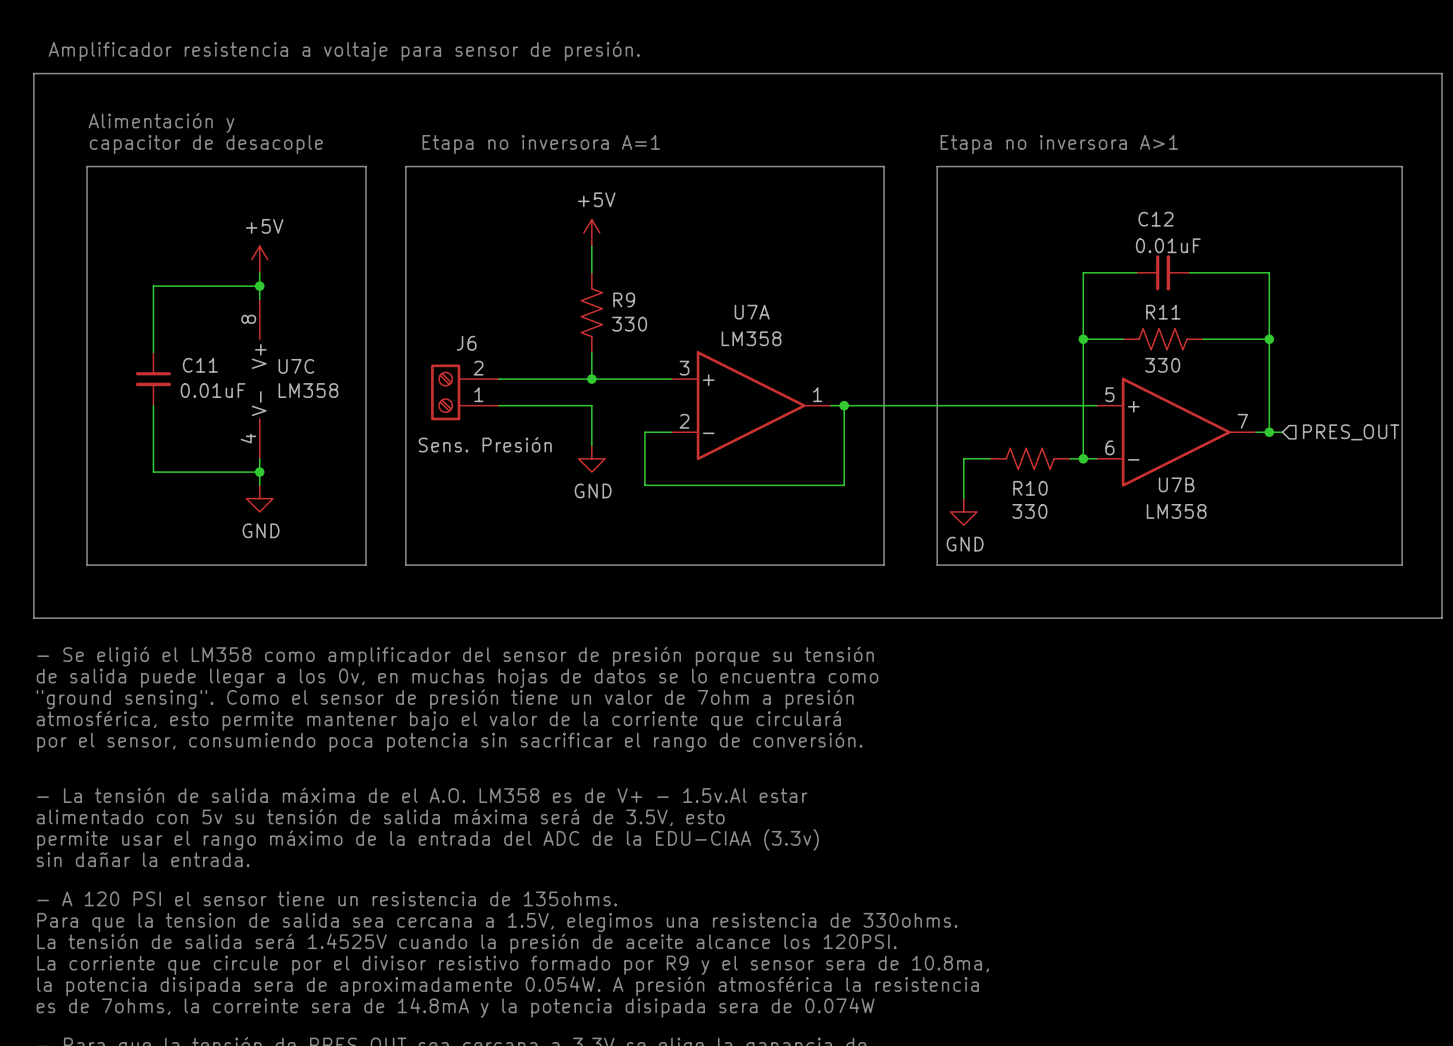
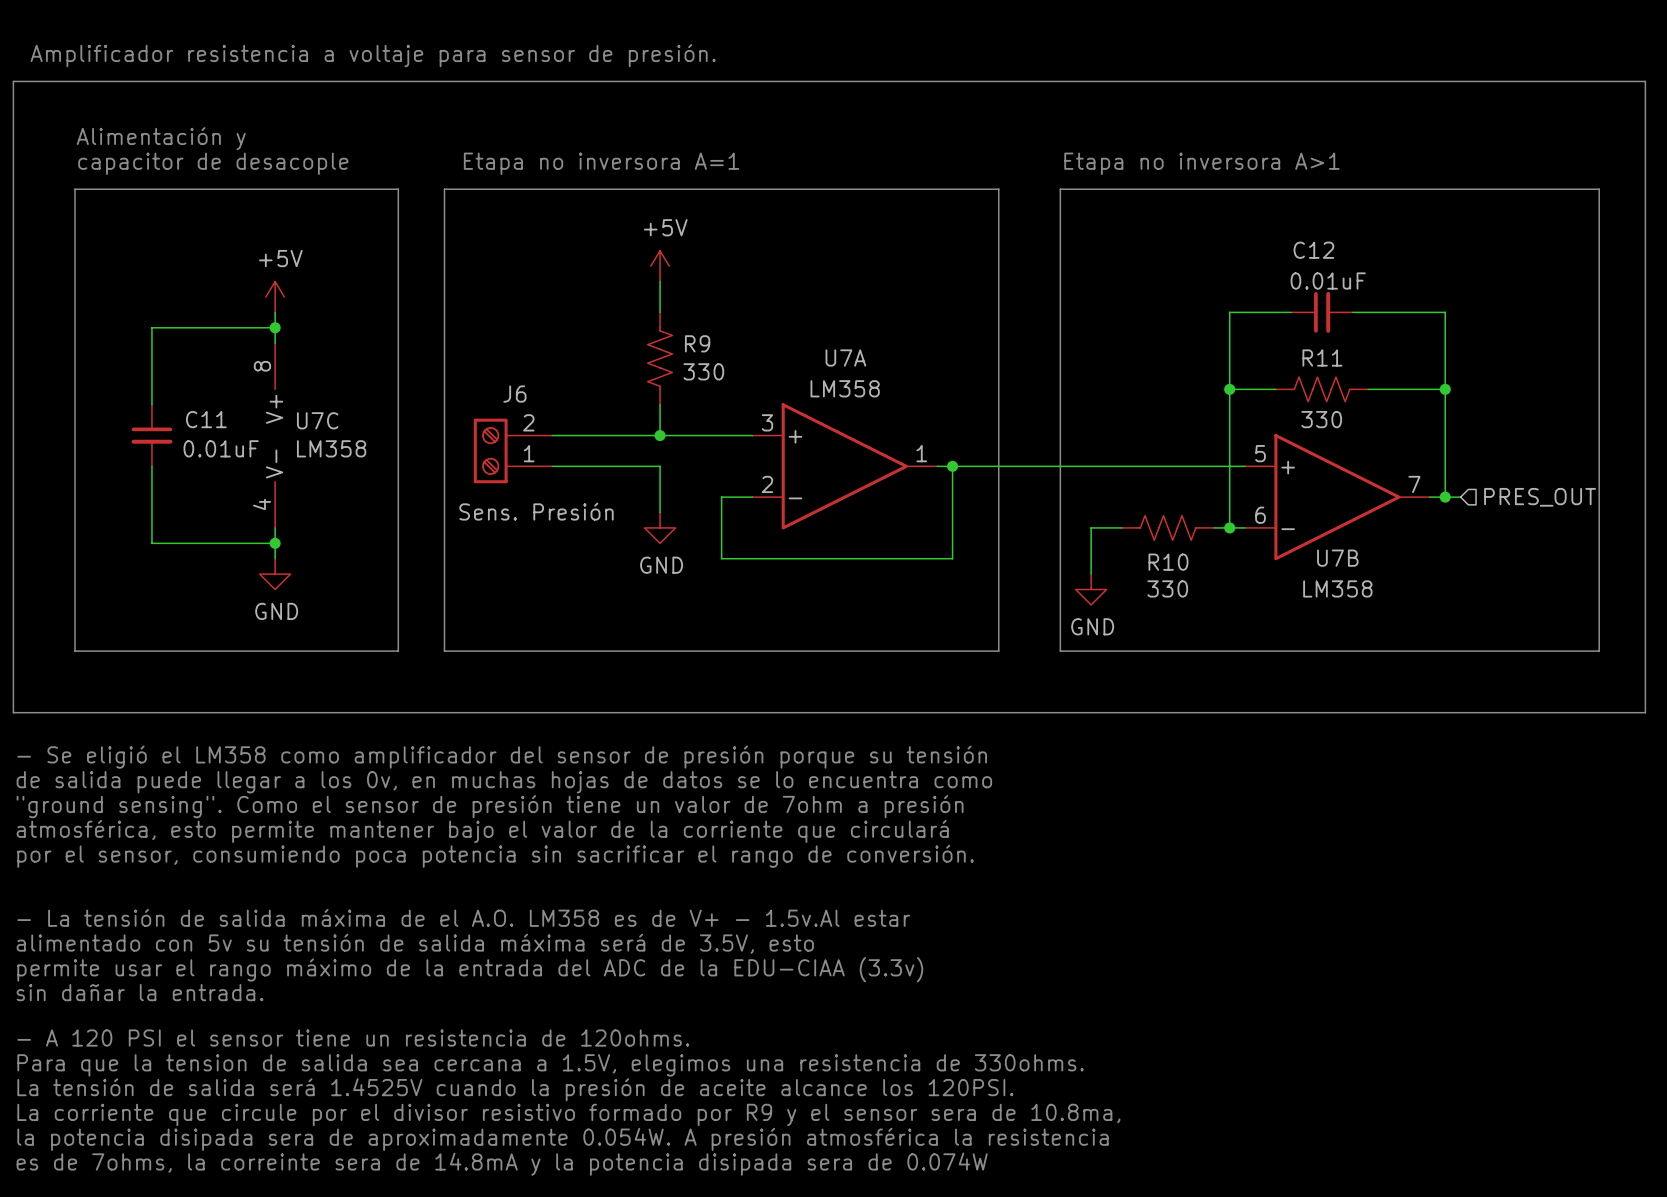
text: - A 120 PSI el sensor tiene un resistencia de 135ohms. (327, 898) -> - A 120 PSI el sensor tiene un resistencia de 120ohms. (353, 1038)

